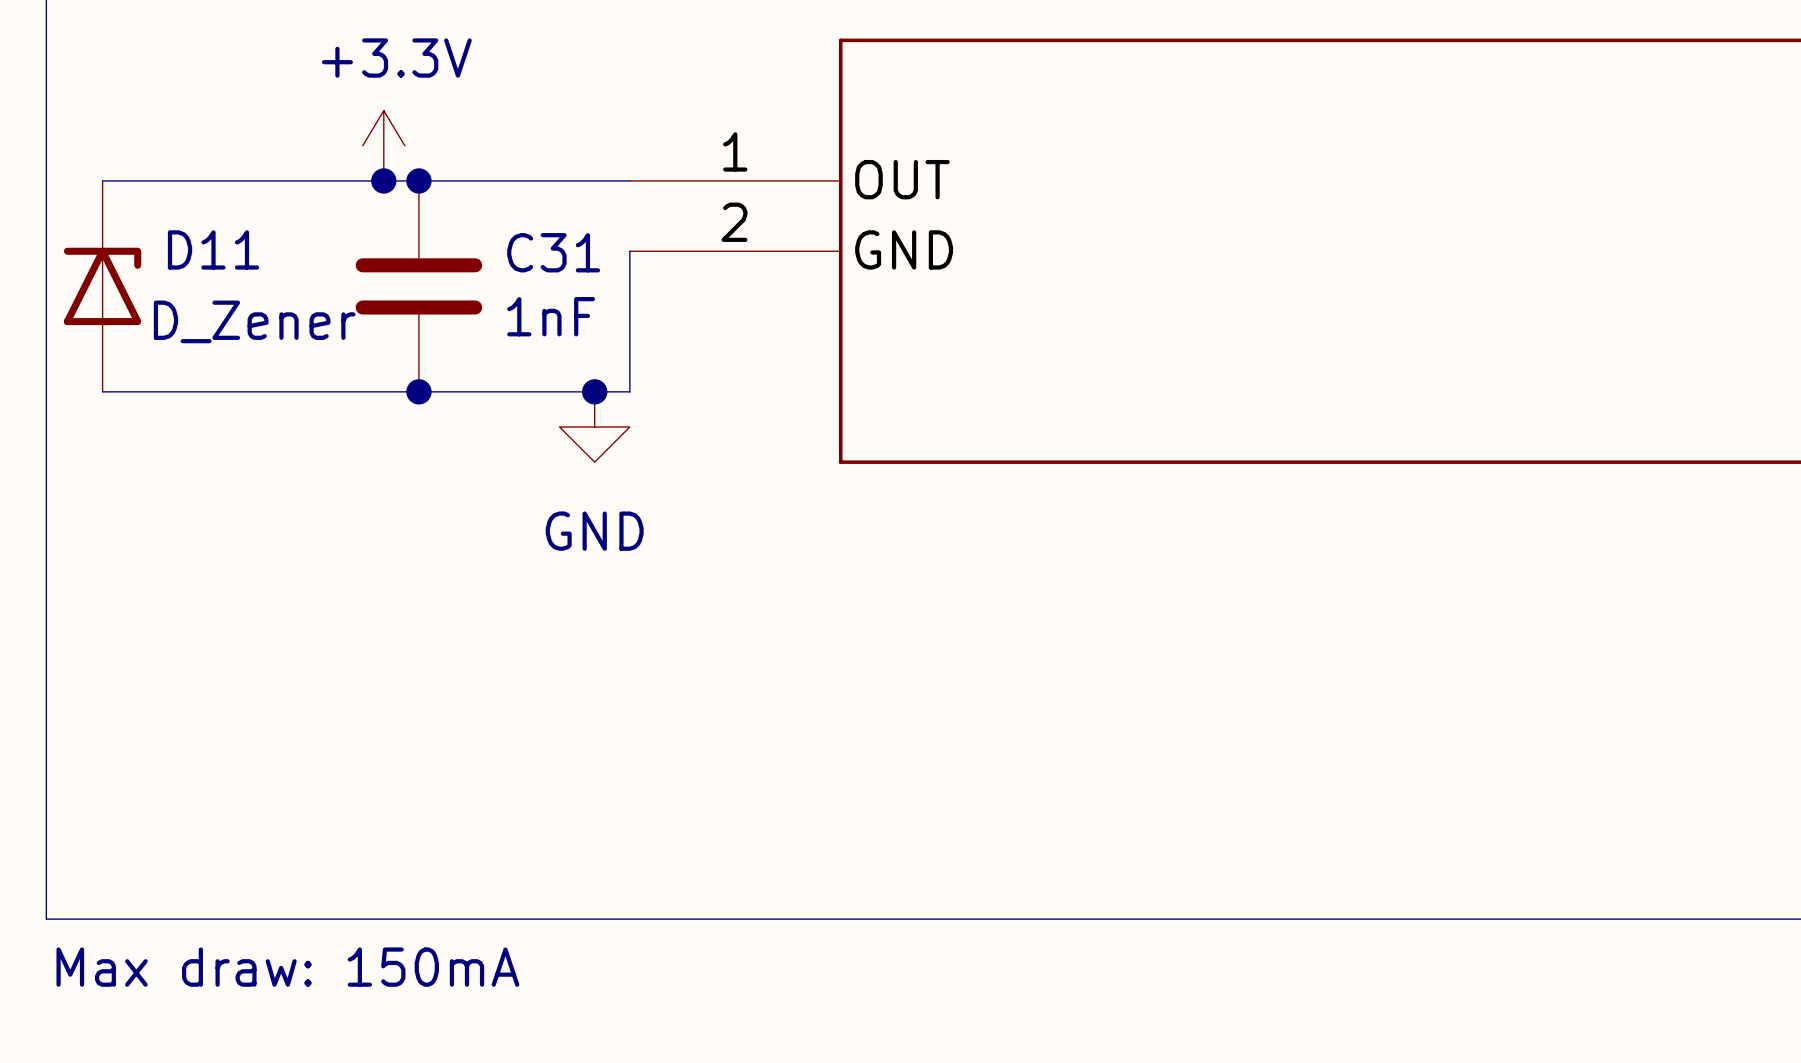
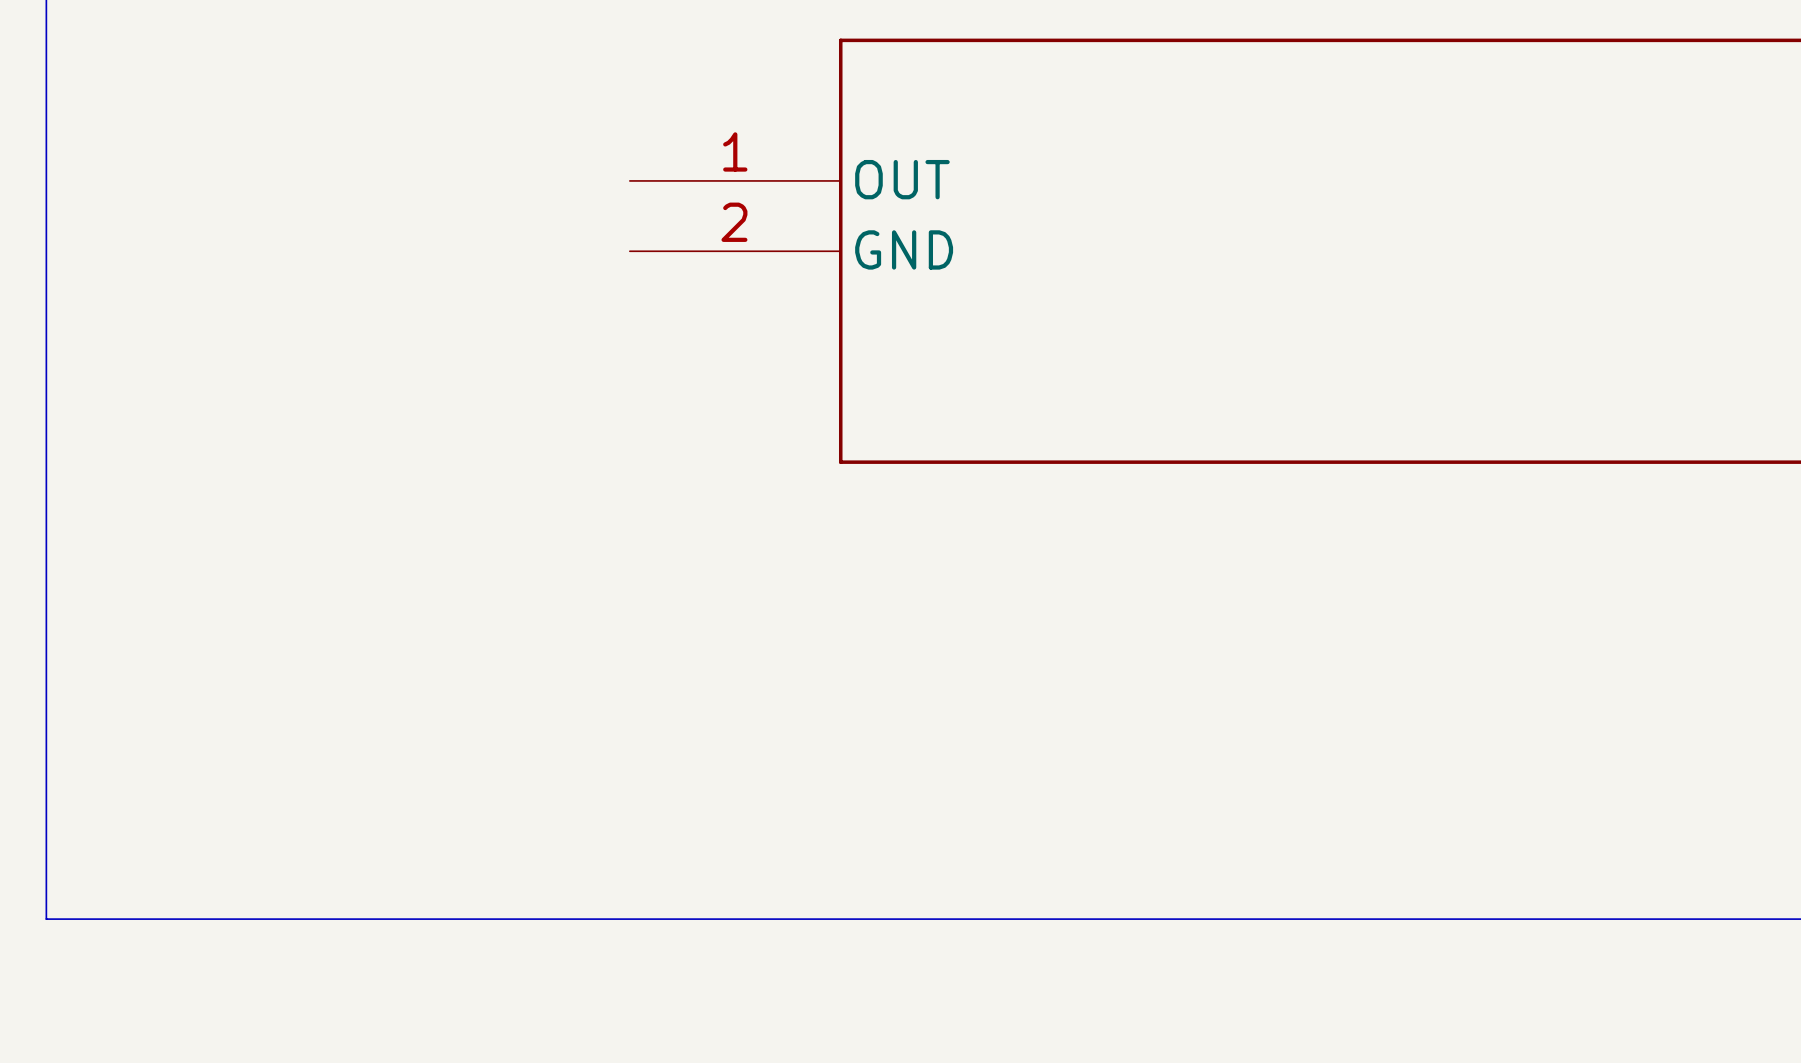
power symbol: +3.3V (383, 145) -> none
wire: (102, 180) (629, 180) -> none
junction: (383, 180) -> none
junction: (418, 180) -> none
wire: (629, 251) (629, 391) (102, 391) -> none
D11: D_Zener (102, 286) -> none
C31: 1nF (418, 286) -> none
junction: (418, 391) -> none
junction: (594, 391) -> none
power symbol: GND (594, 427) -> none
text: Max draw: 150mA (287, 967) -> none

